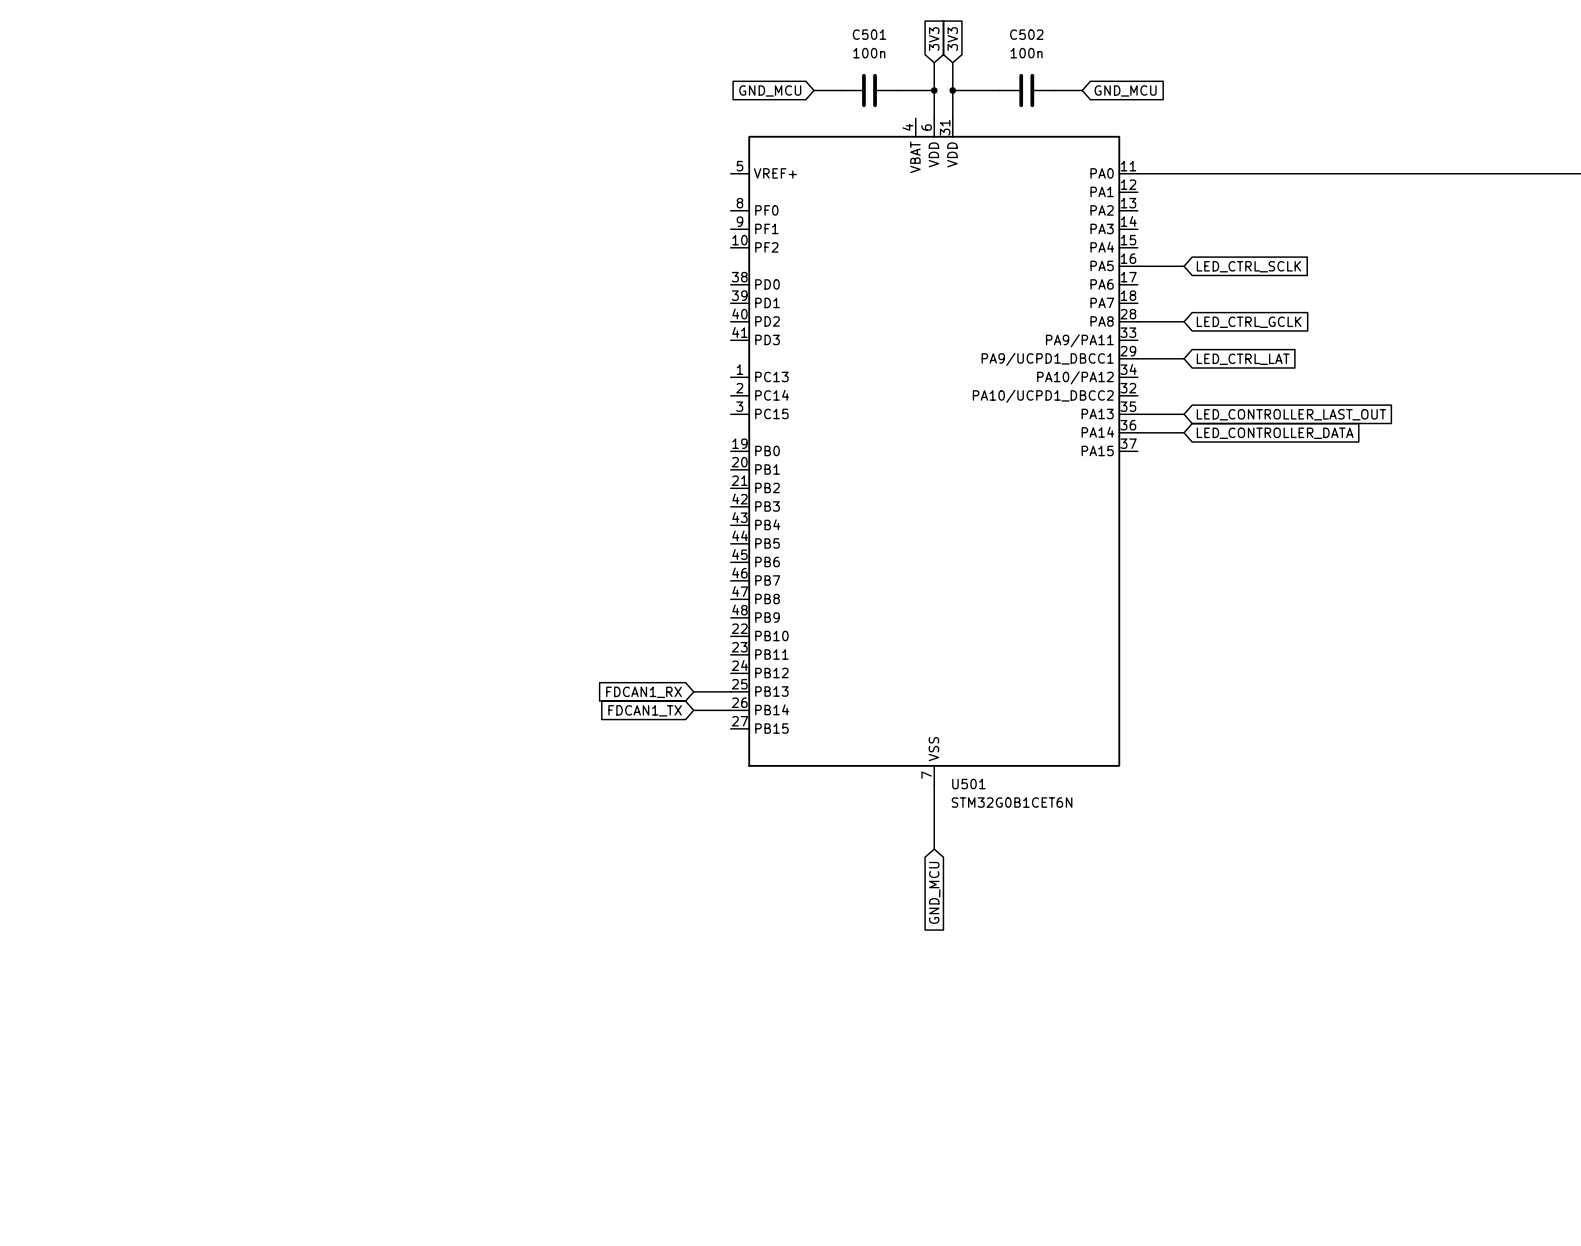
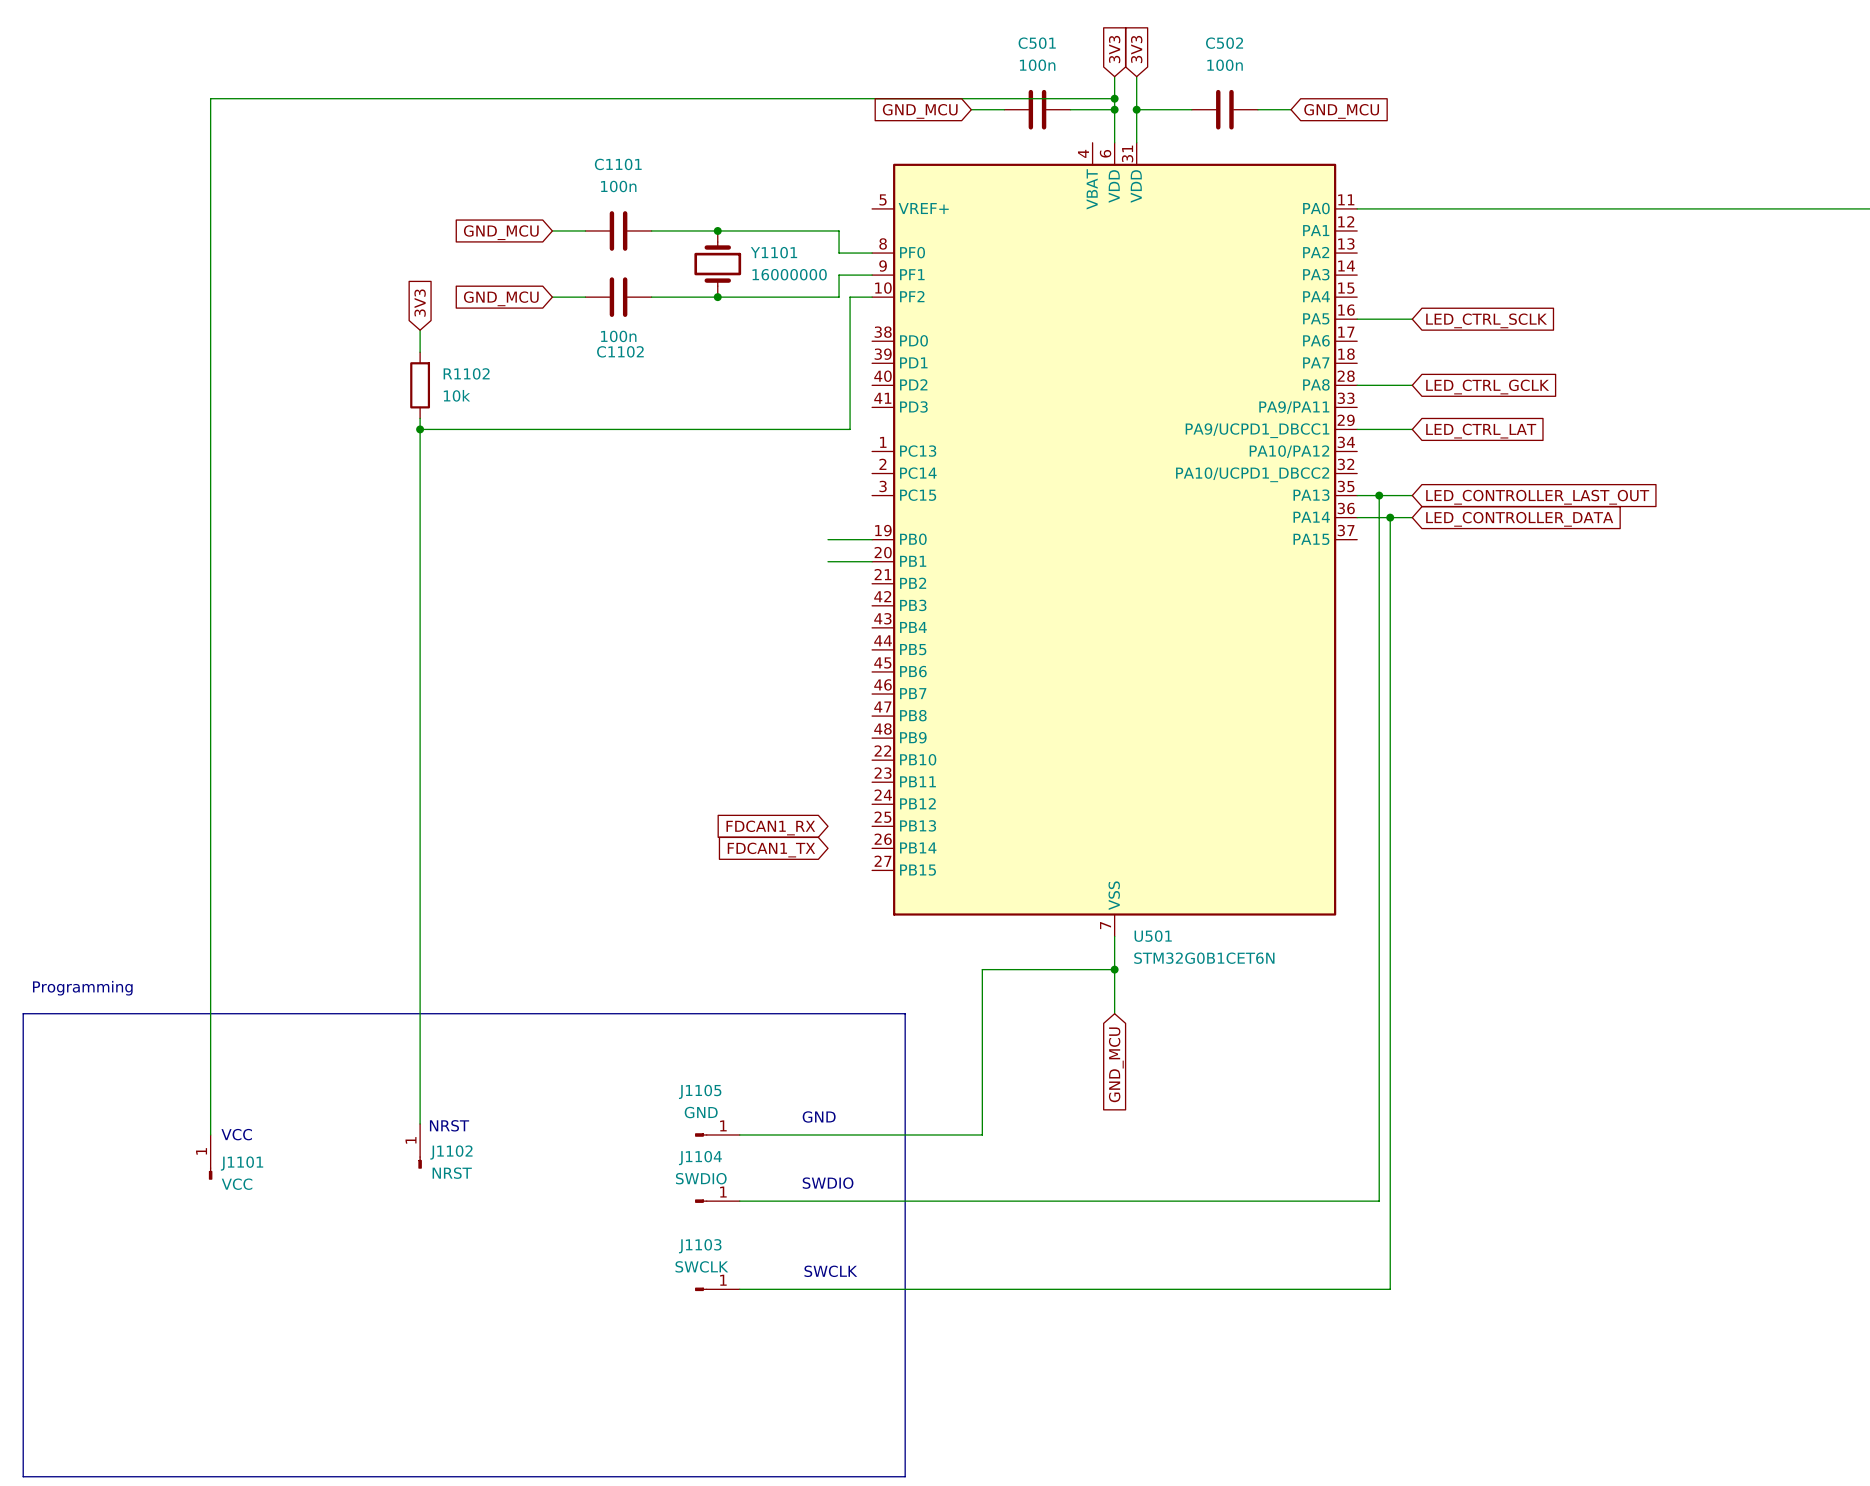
wire: none -> (1114, 98) (210, 98) (210, 1134)
junction: none -> (1114, 98)
global label: none -> GND_MCU (501, 232)
wire: none -> (552, 230) (585, 230)
C1101: none -> 100n (618, 230)
wire: none -> (651, 230) (839, 230) (839, 253) (872, 253)
junction: none -> (717, 230)
Y1101: none -> 16000000 (717, 264)
wire: none -> (872, 275) (839, 275) (839, 297) (651, 297)
wire: none -> (552, 297) (585, 297)
C1102: none -> 100n (618, 297)
junction: none -> (717, 297)
wire: none -> (872, 297) (850, 297) (850, 429) (420, 429)
global label: none -> GND_MCU (501, 298)
global label: none -> 3V3 (420, 303)
wire: none -> (420, 330) (420, 352)
R1102: none -> 10k (420, 385)
wire: none -> (420, 418) (420, 1123)
junction: none -> (420, 429)
wire: none -> (1379, 495) (1379, 1201) (739, 1201)
junction: none -> (1379, 495)
wire: none -> (1390, 517) (1390, 1289) (739, 1289)
junction: none -> (1390, 517)
wire: none -> (828, 539) (872, 539)
wire: none -> (828, 561) (872, 561)
wire: (693, 691) (730, 691) -> none
wire: (693, 710) (730, 710) -> none
wire: none -> (1114, 969) (982, 969) (982, 1134) (739, 1134)
junction: none -> (1114, 969)
text: none -> Programming (82, 988)
line: none -> (23, 1013) (905, 1013) (905, 1476) (23, 1476) (23, 1013)
text: none -> GND (819, 1116)
text: none -> NRST (449, 1125)
text: none -> VCC (236, 1134)
J1105: none -> GND (717, 1134)
J1102: none -> NRST (420, 1146)
J1101: none -> VCC (210, 1157)
text: none -> SWDIO (828, 1183)
J1104: none -> SWDIO (717, 1201)
text: none -> SWCLK (830, 1271)
J1103: none -> SWCLK (717, 1289)

